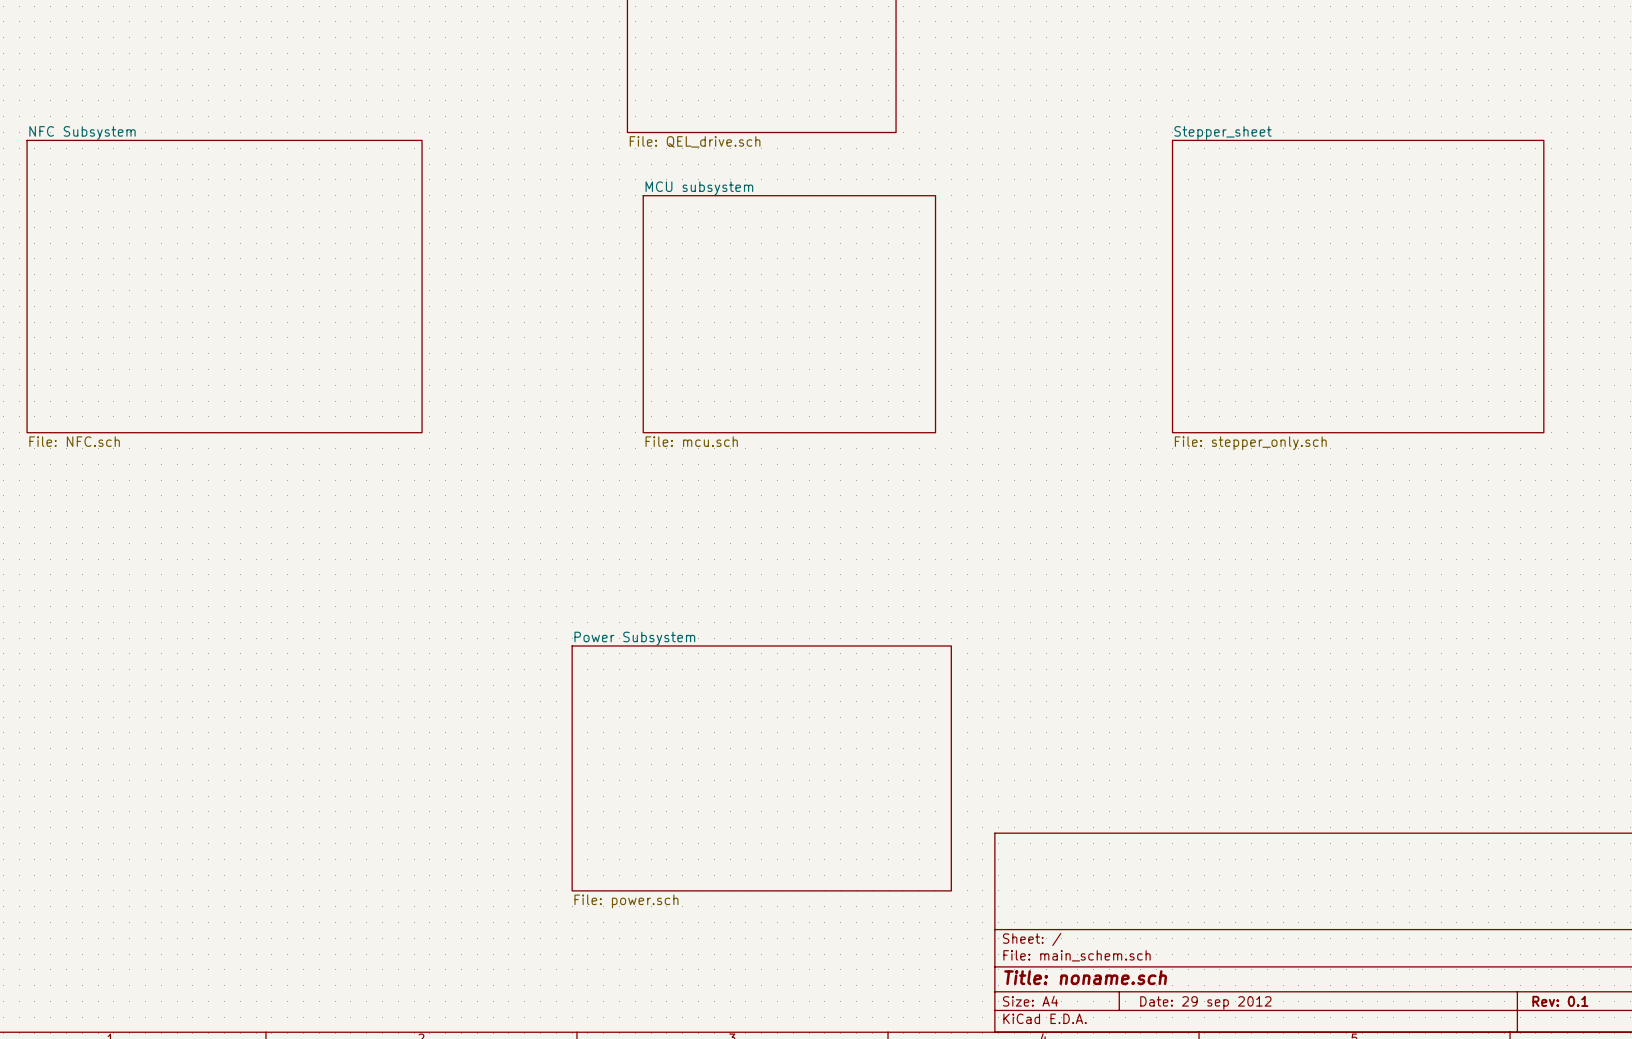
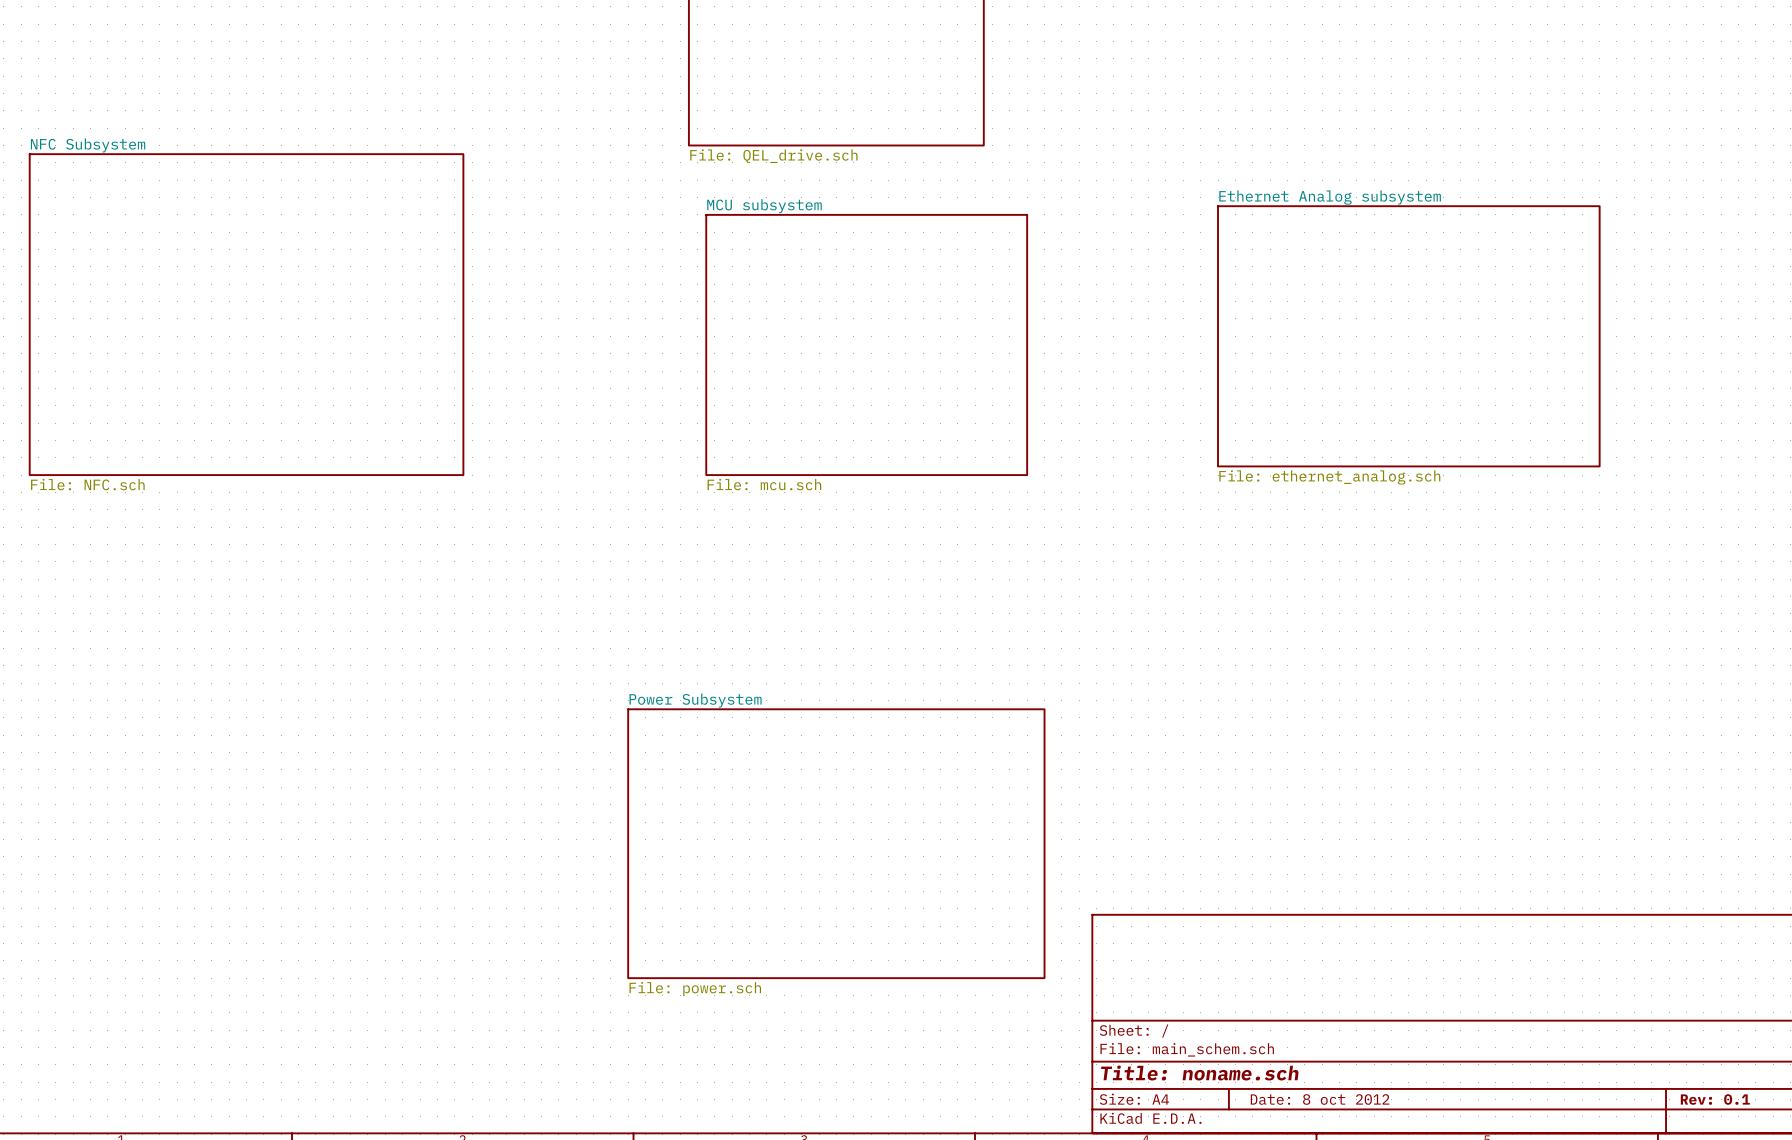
sheet Stepper_sheet: File: stepper_only.sch (1358, 286) -> none
sheet Ethernet Analog subsystem: none -> File: ethernet_analog.sch (1408, 336)
title block: Date: 29 sep 2012 (1205, 1002) -> Date: 8 oct 2012 (1320, 1099)

